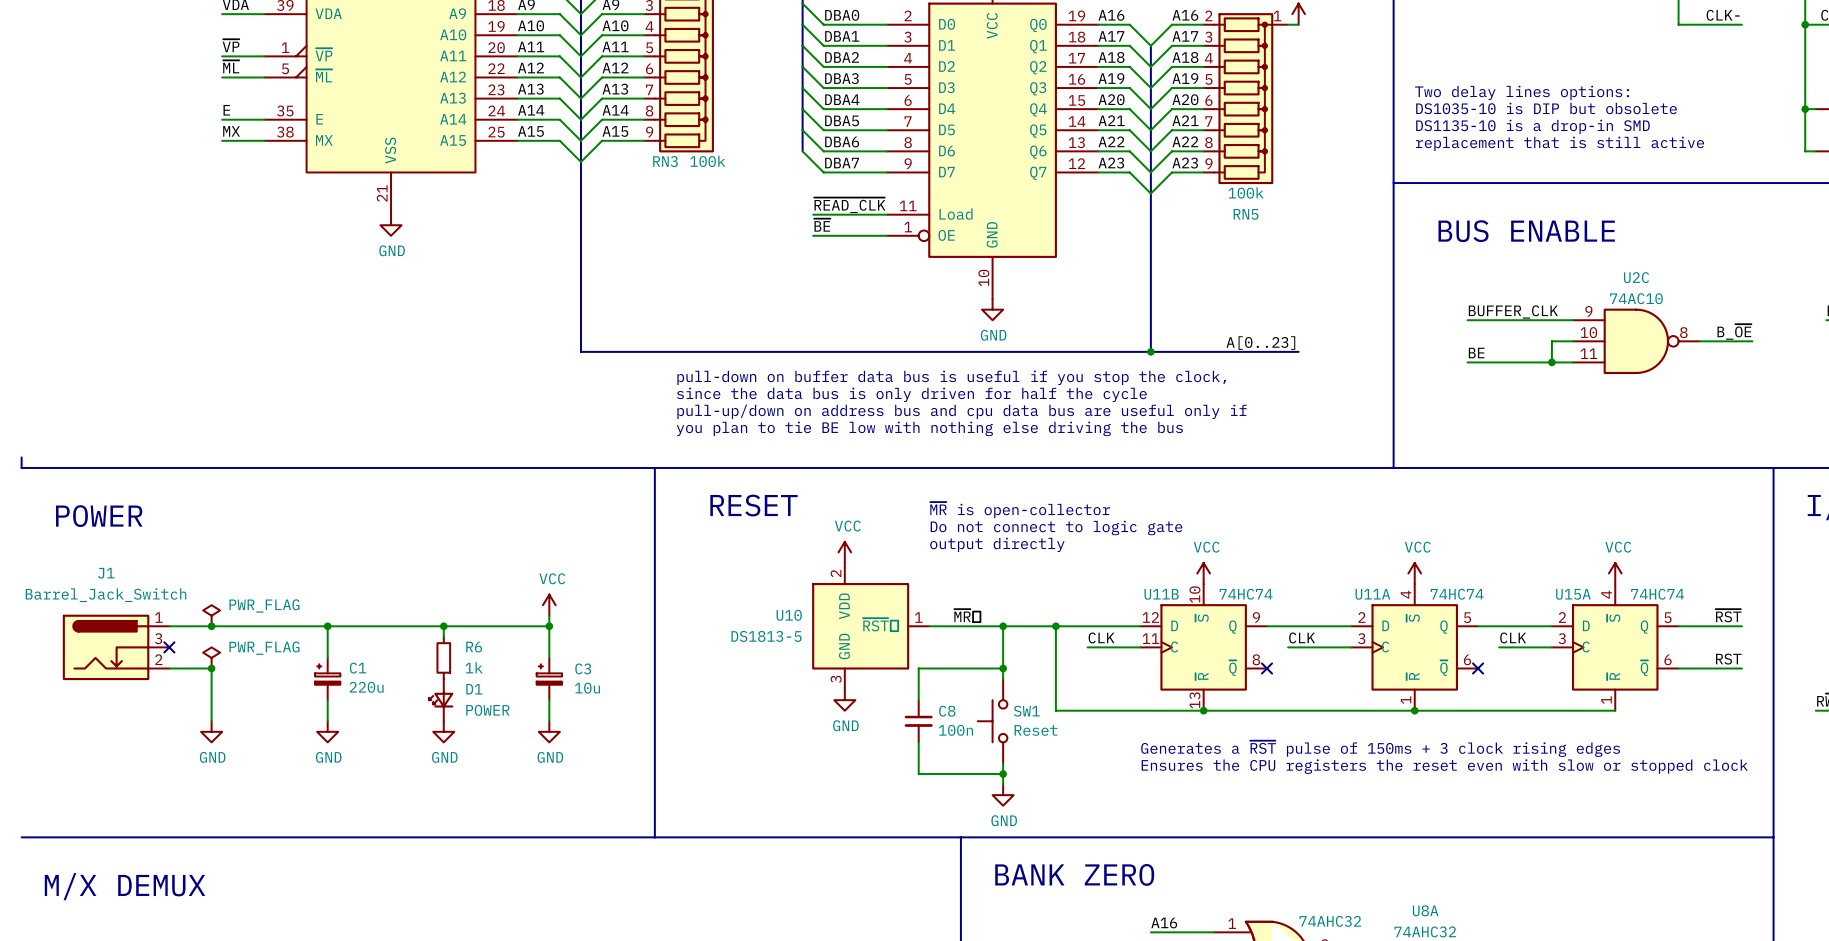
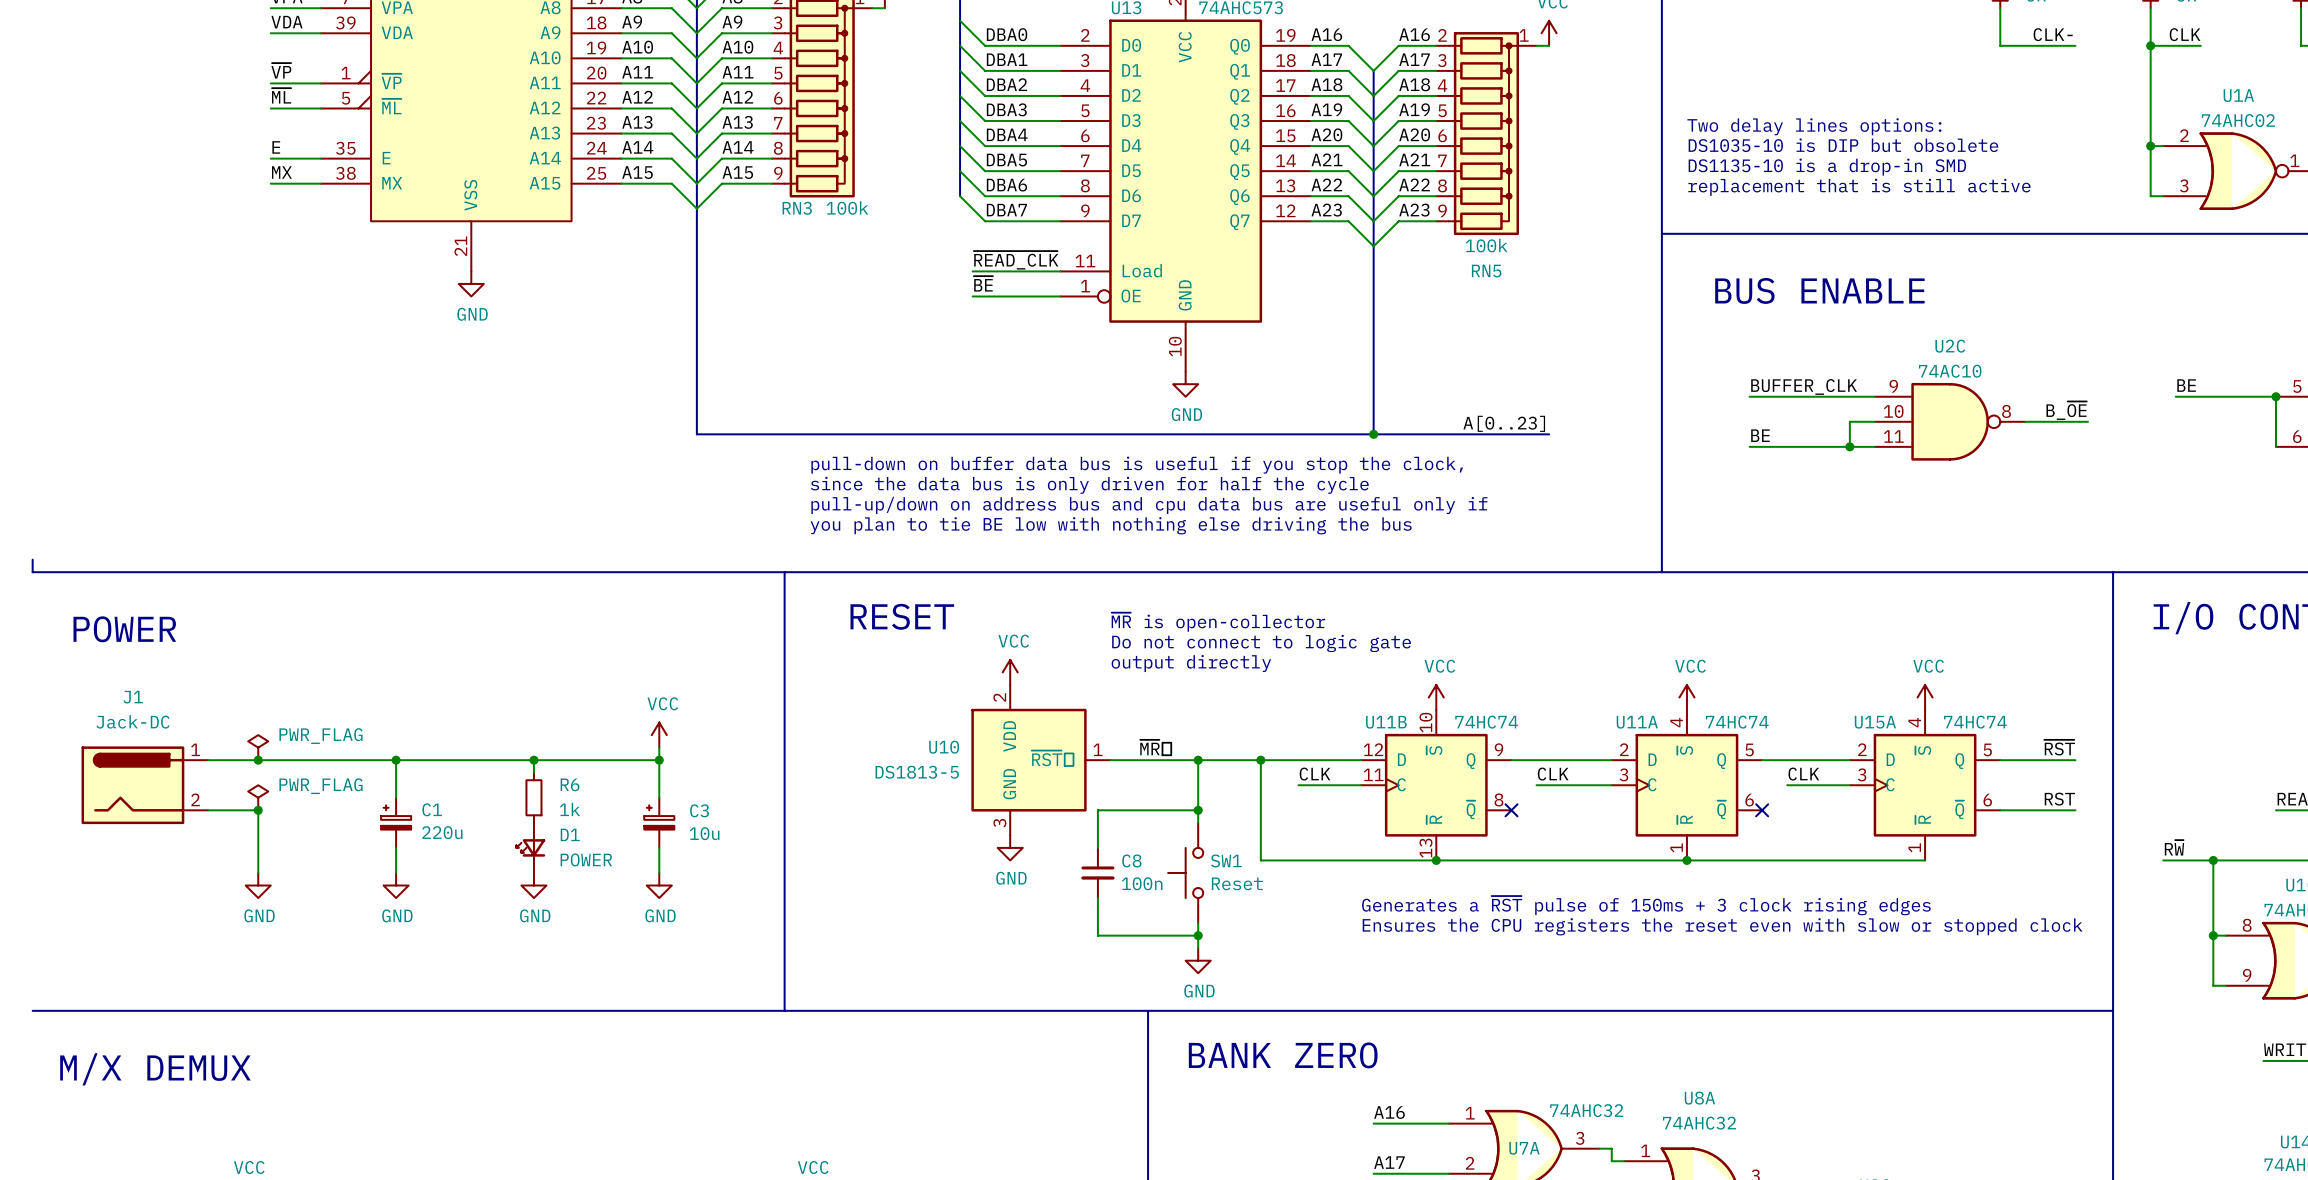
J1 value: Barrel_Jack_Switch (106, 595) -> Jack-DC (133, 721)
J1 symbol: [62, 614, 170, 681] -> [81, 746, 209, 825]
no-connect mark: (169, 647) -> none

